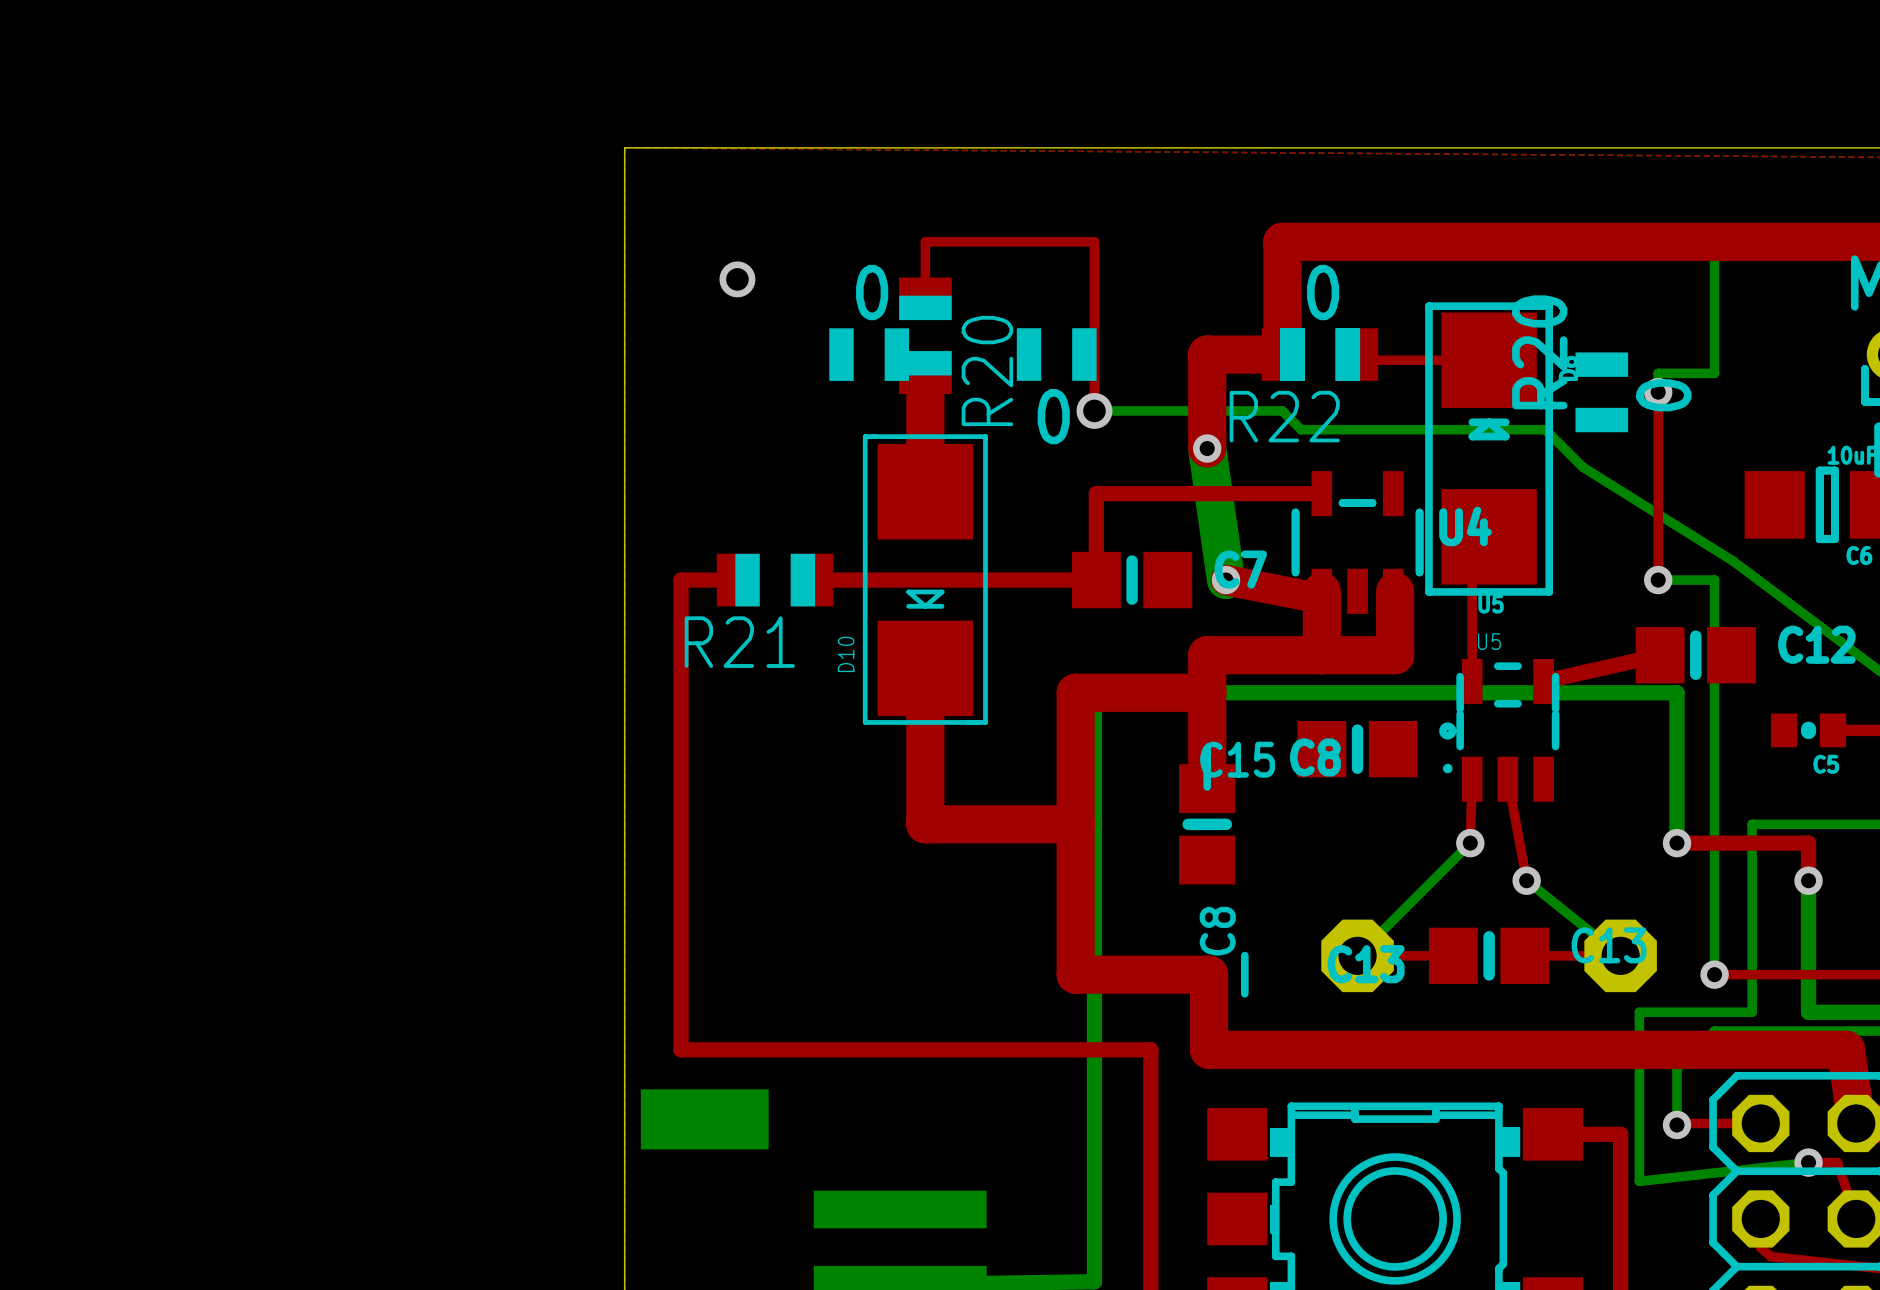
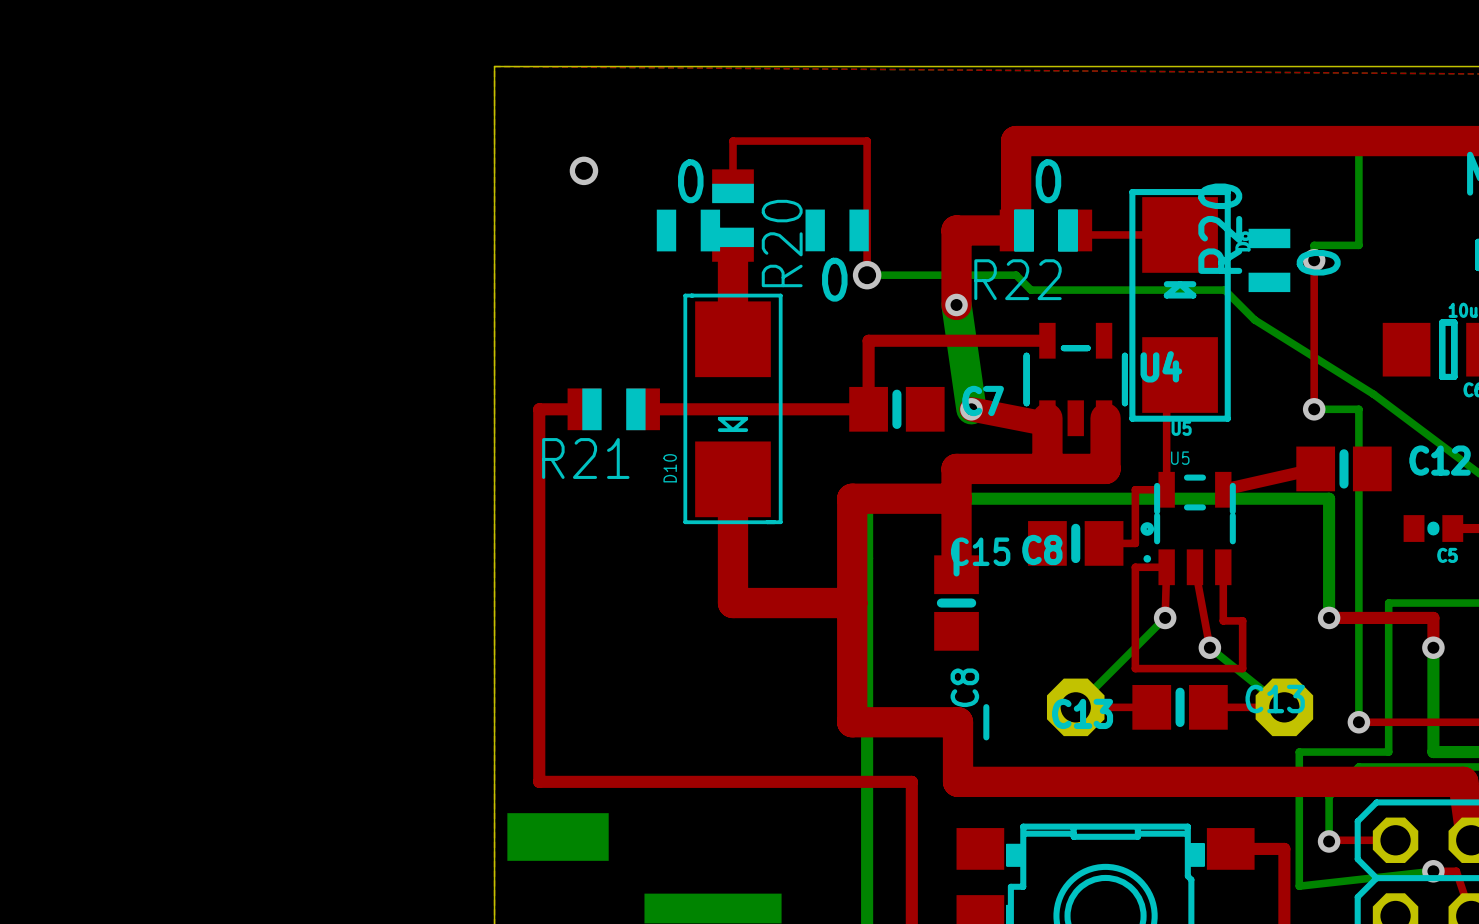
top track: none -> (1166, 489) (1135, 489) (1135, 543) (1104, 543)
top track: none -> (1166, 567) (1135, 567) (1135, 668) (1242, 668) (1242, 620) (1223, 620) (1223, 567)

